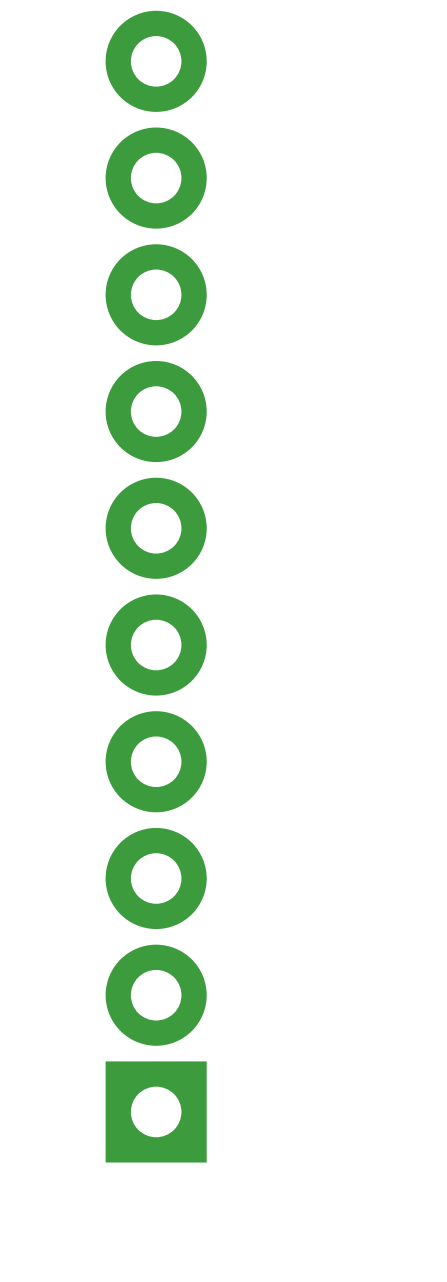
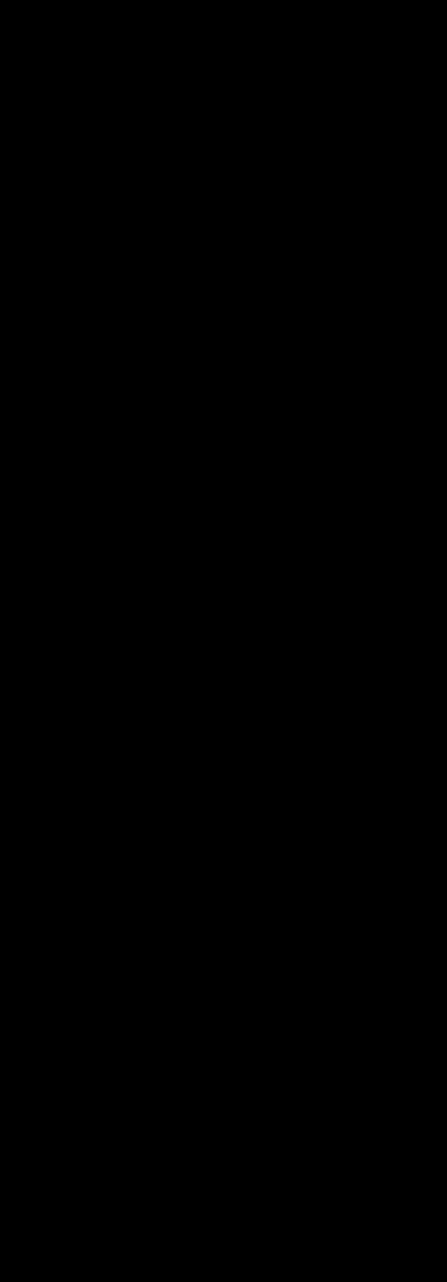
part: (156, 586) -> none

